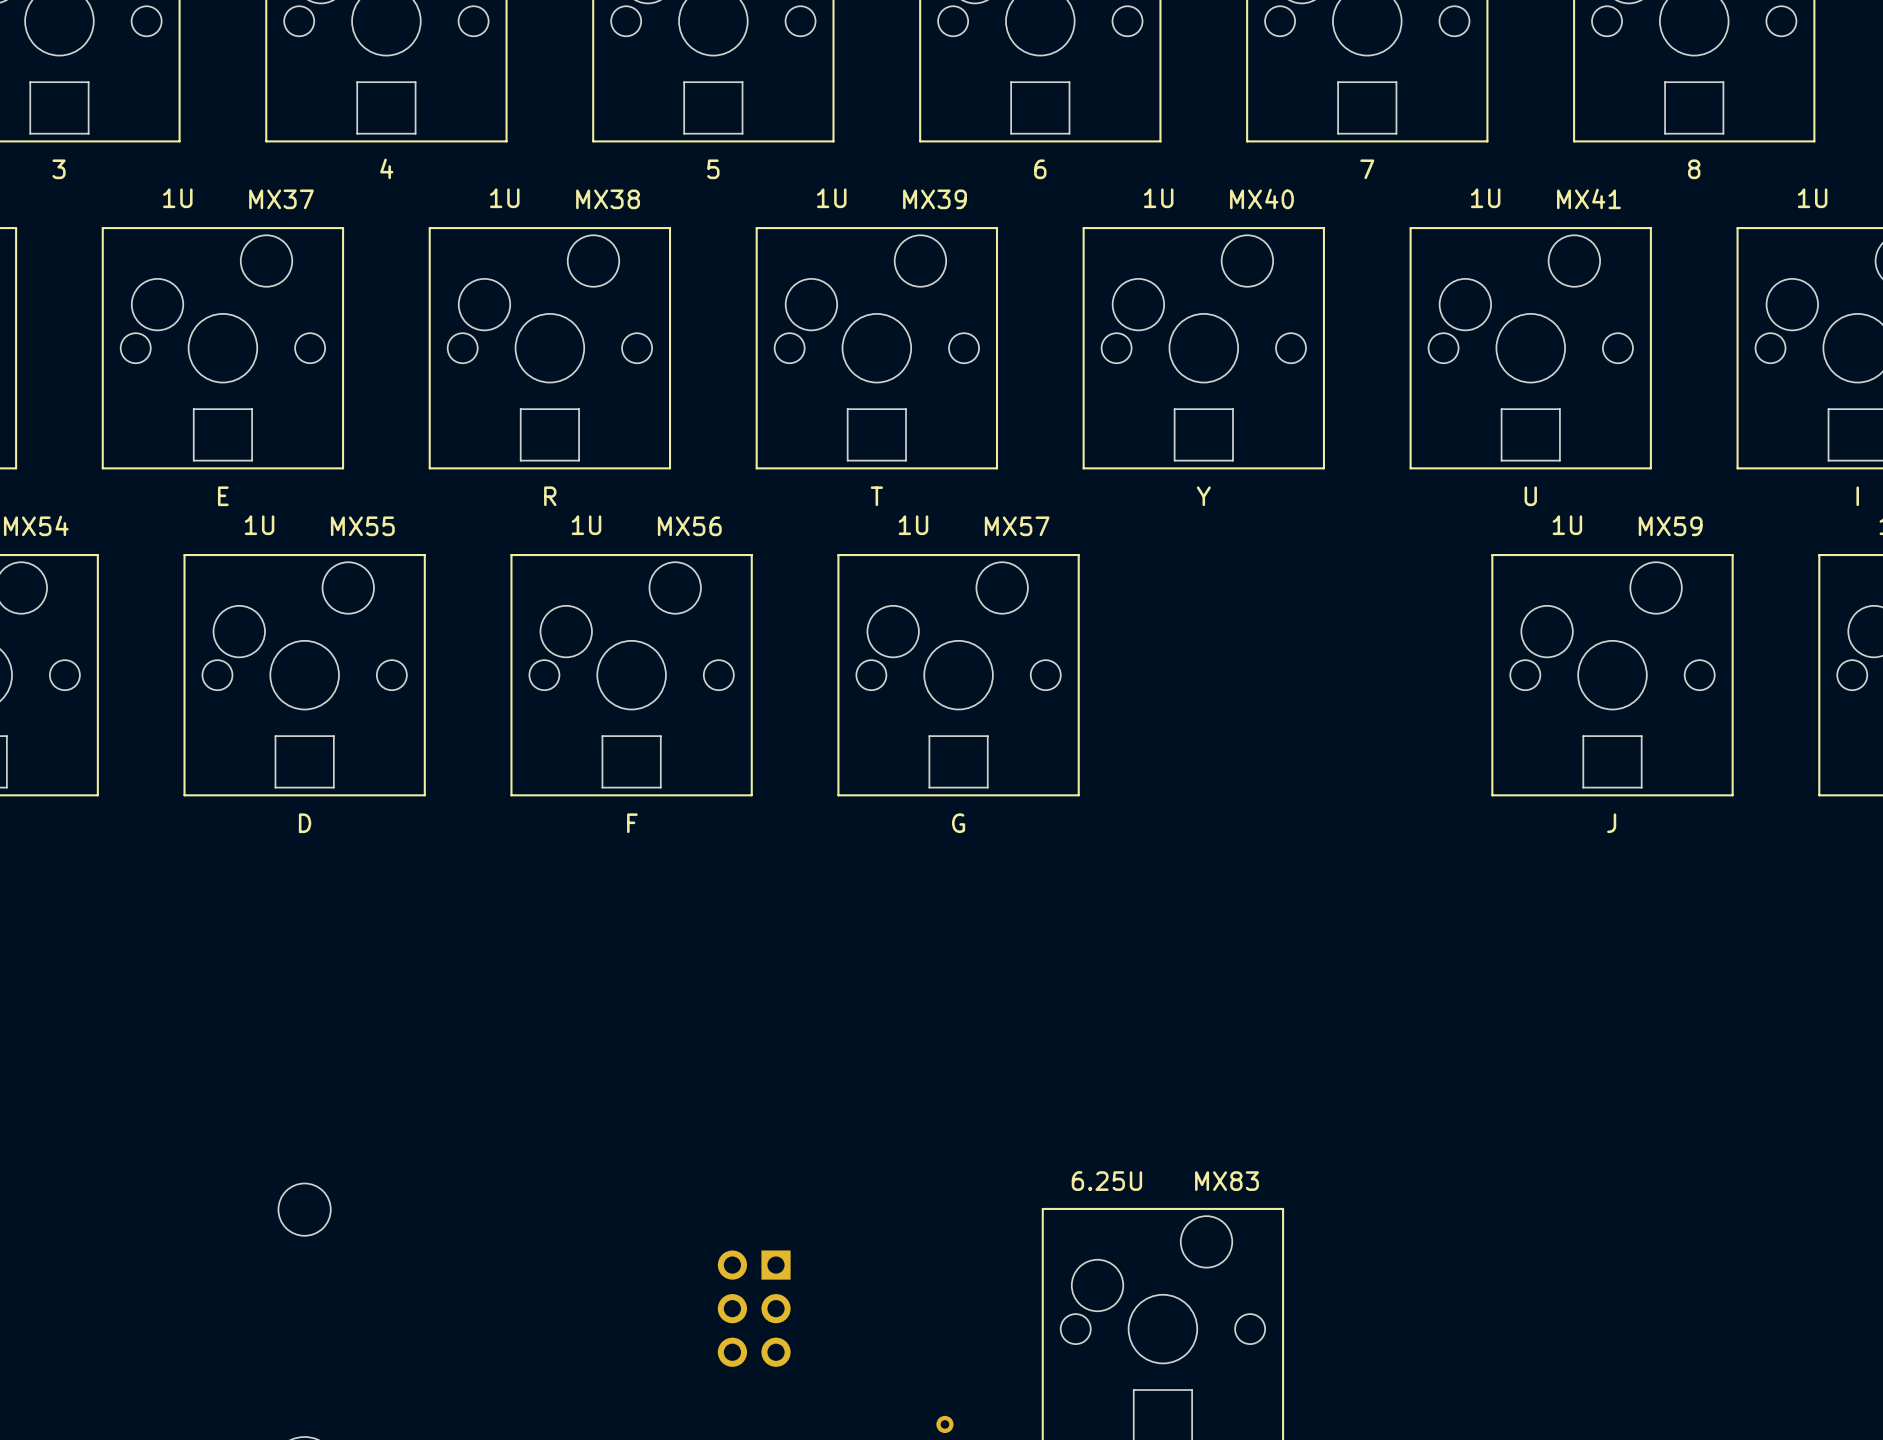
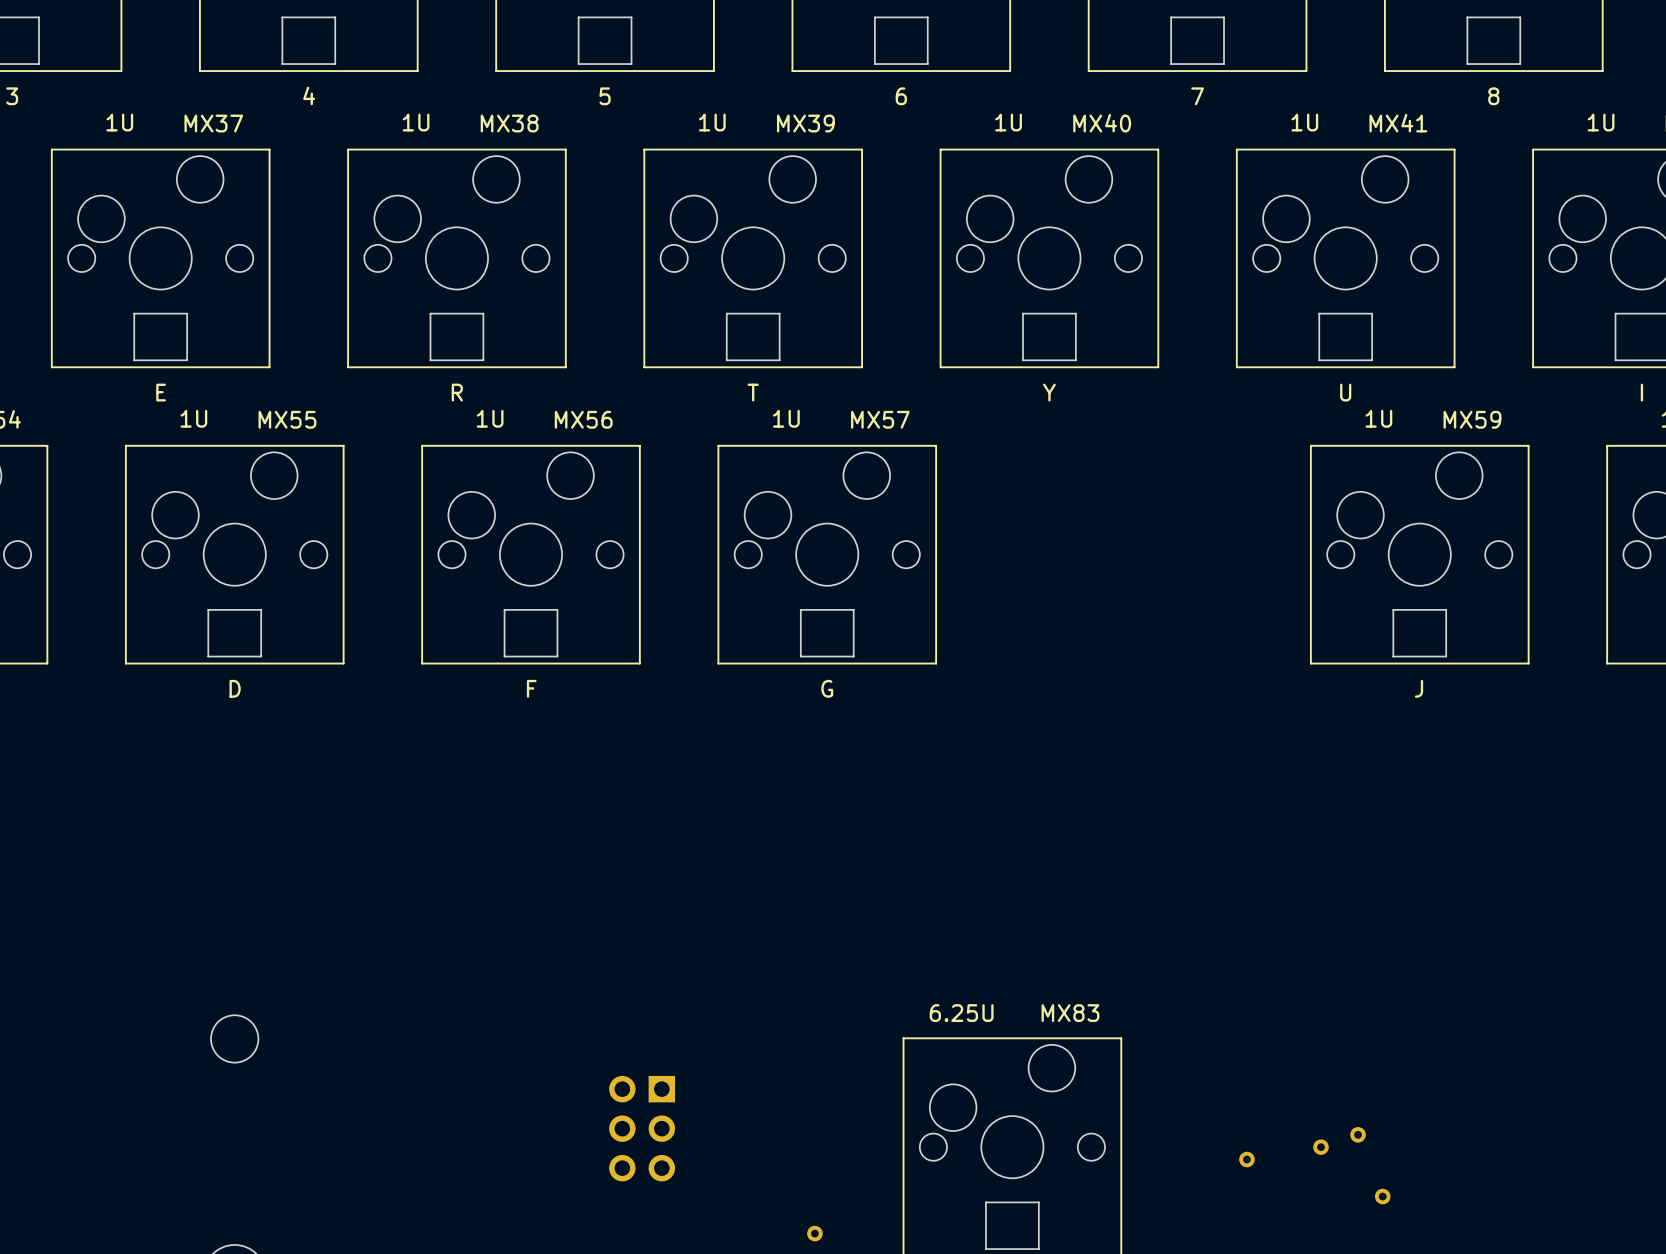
part: none -> (1358, 1134)
part: none -> (1321, 1147)
part: none -> (1246, 1159)
part: none -> (1382, 1196)

